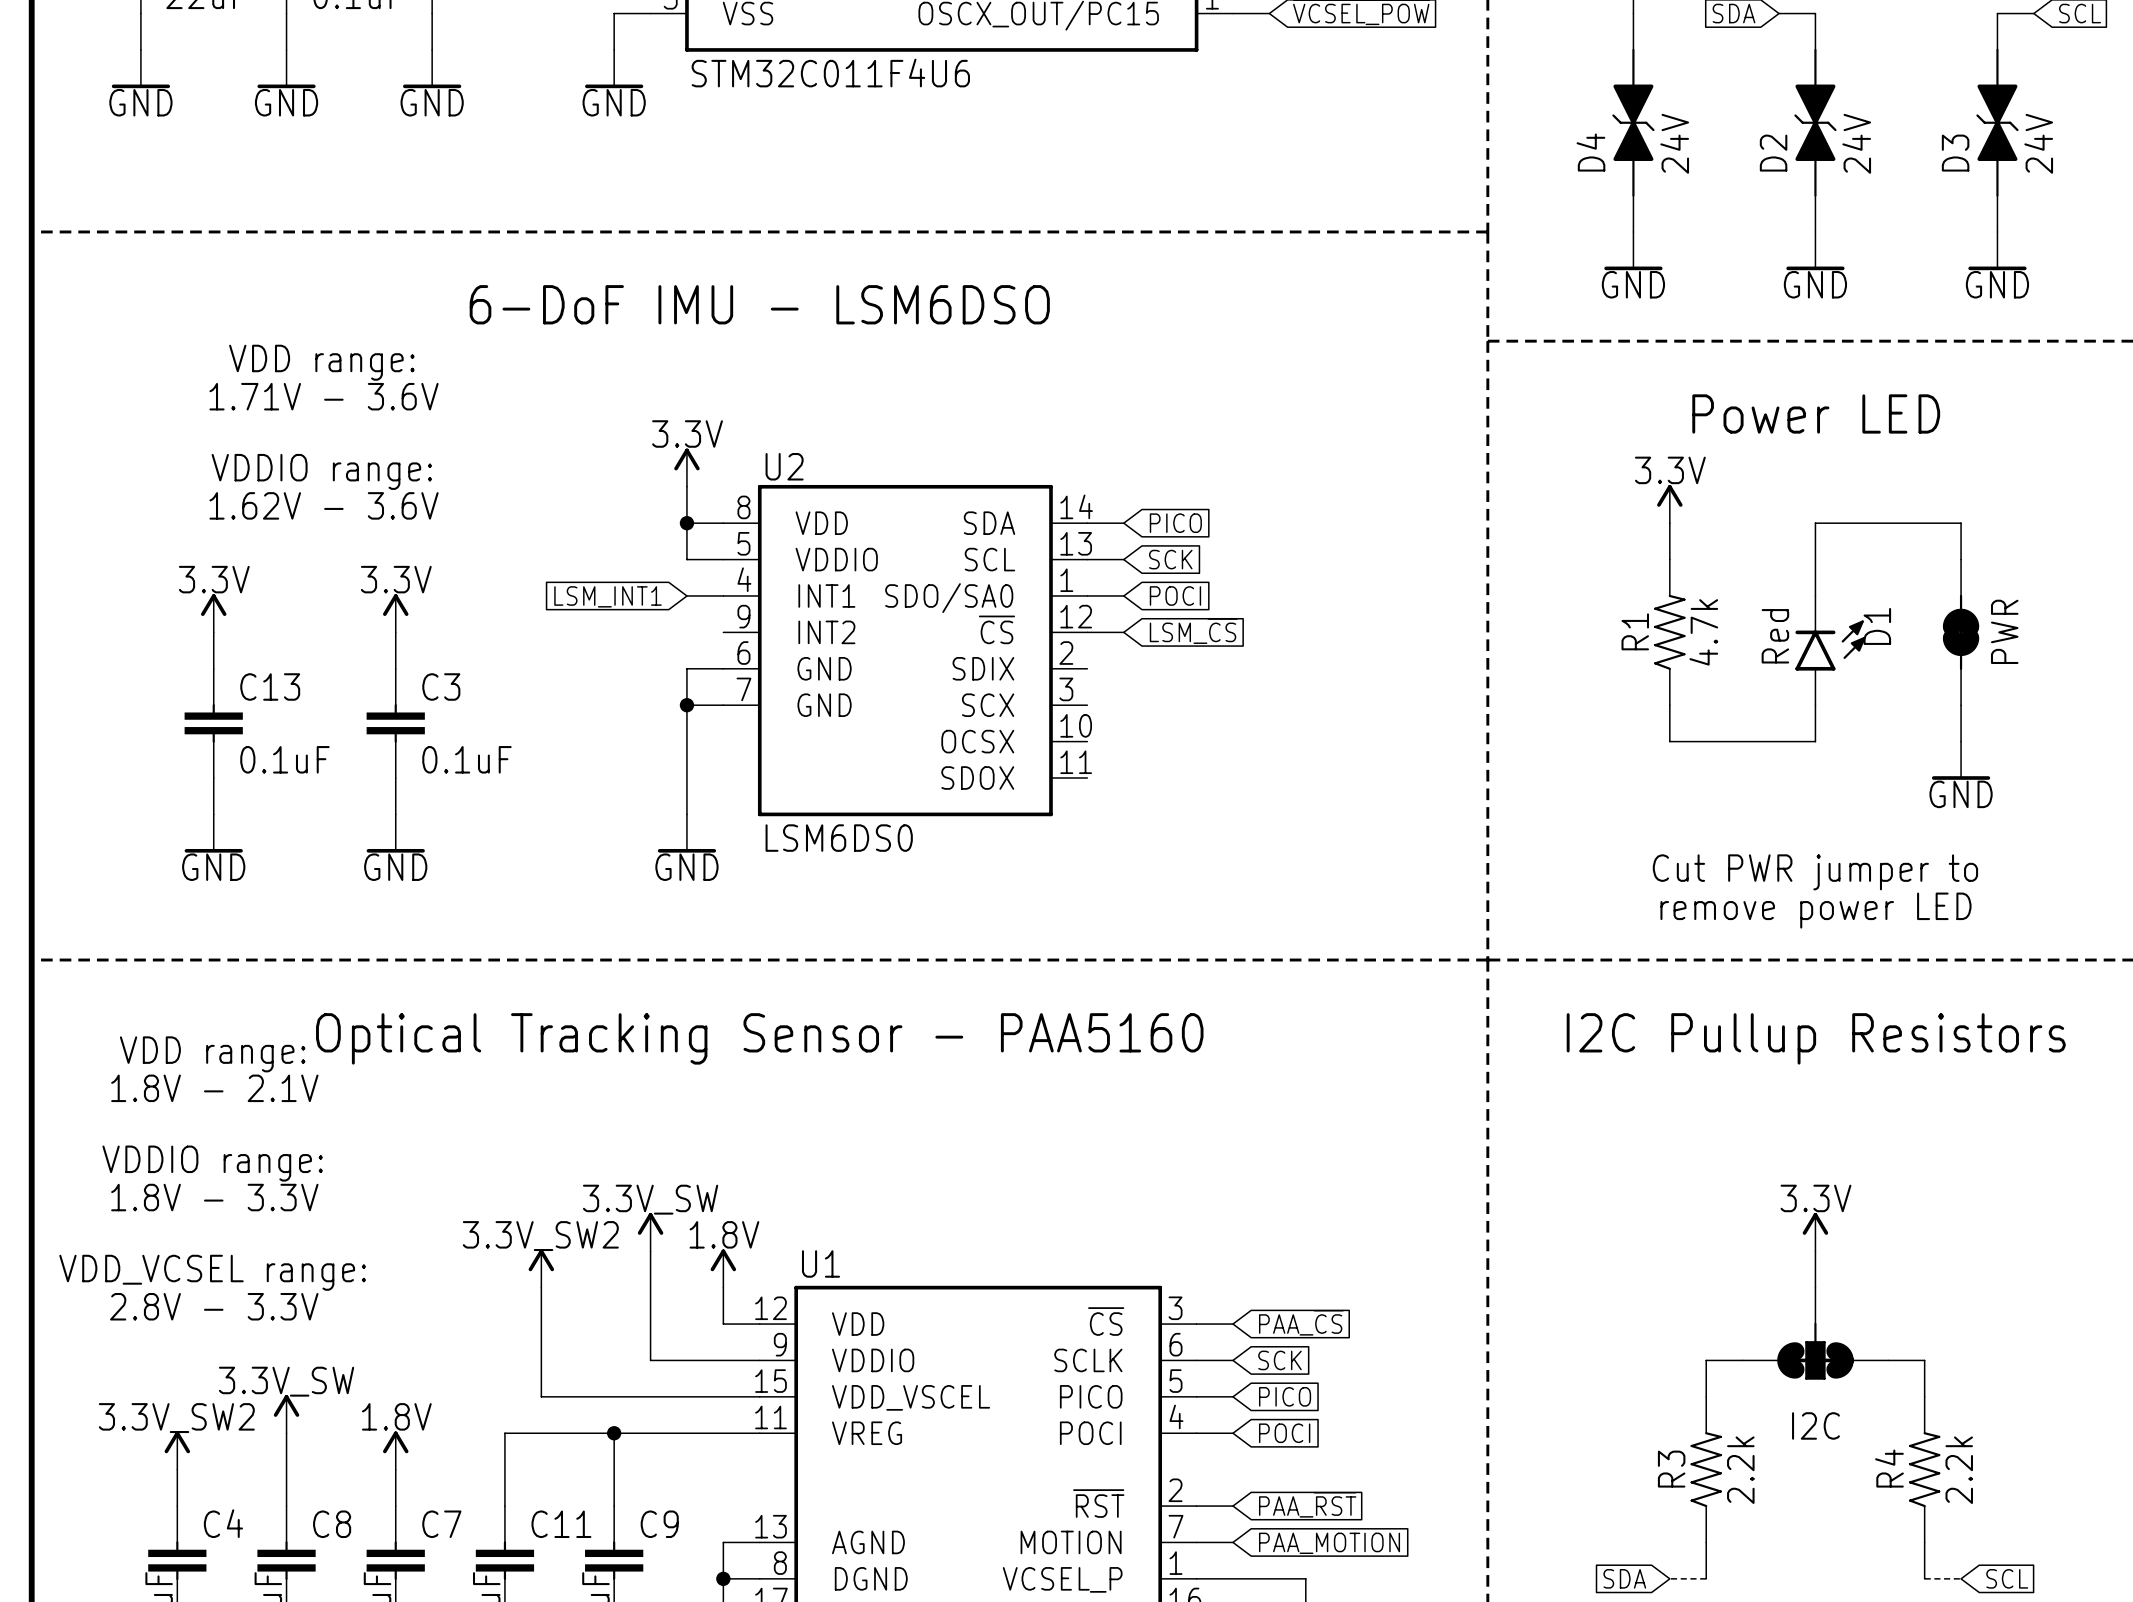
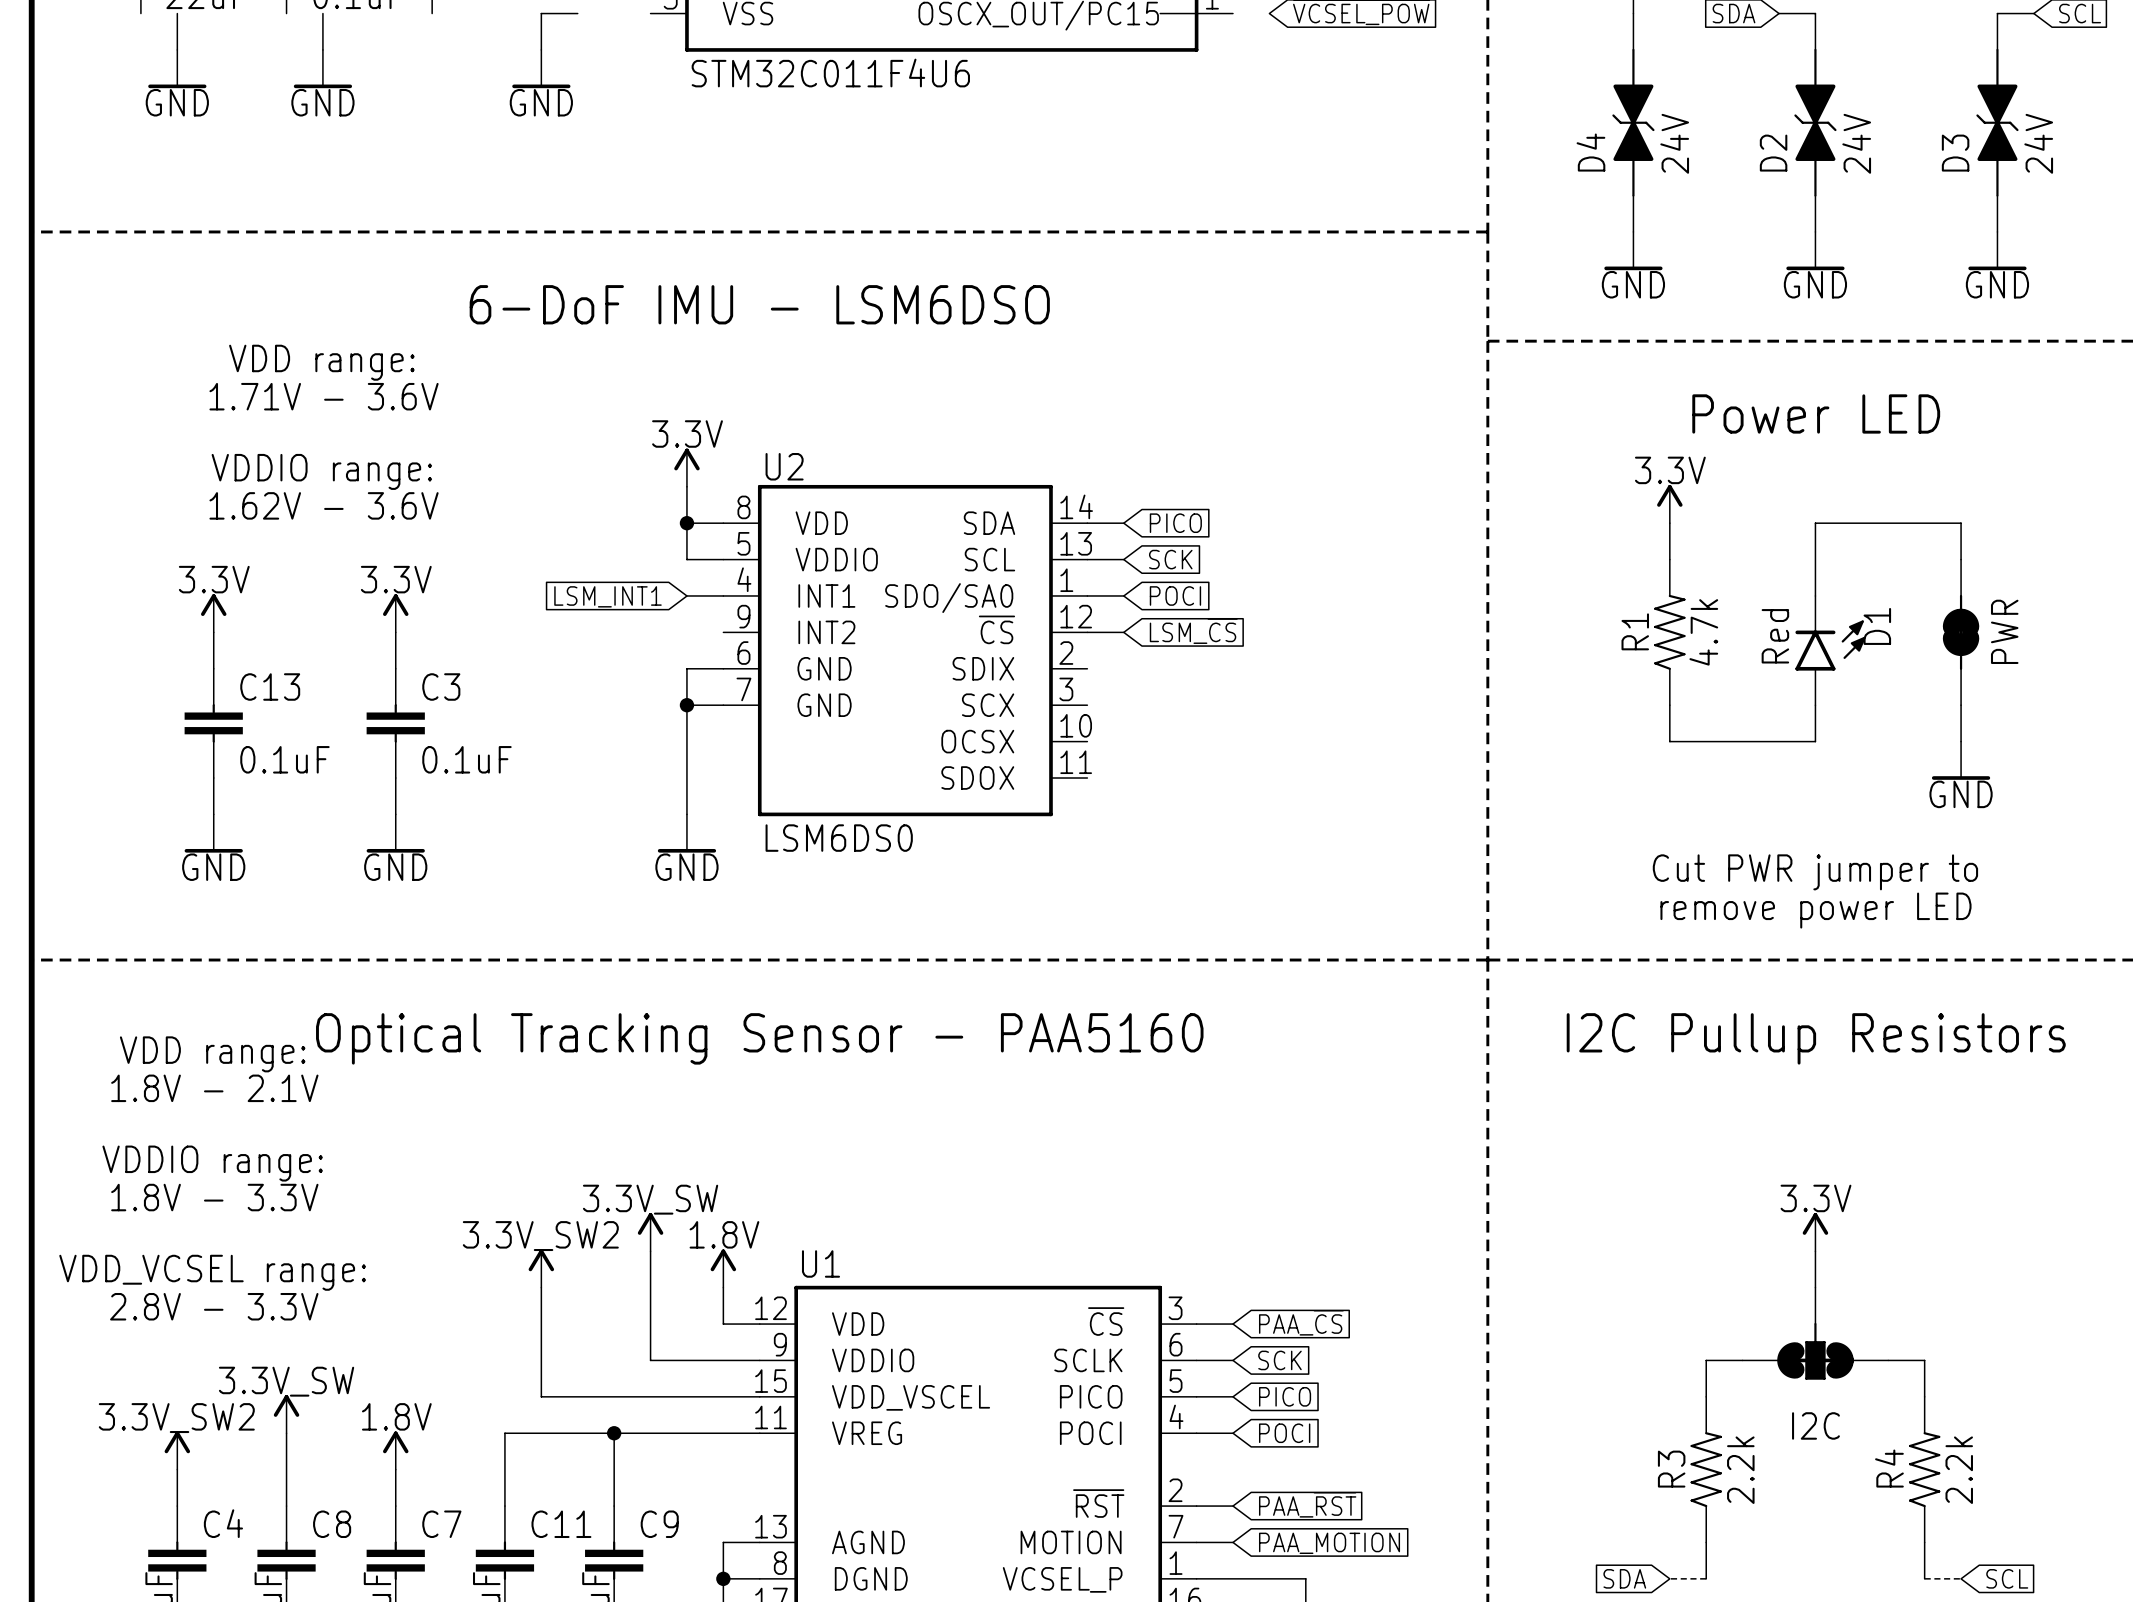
wire: (140, 13) (140, 49) -> (177, 13) (177, 49)
wire: (286, 13) (286, 49) -> (322, 13) (322, 49)
wire: (432, 13) (432, 49) -> none
wire: (650, 13) (614, 13) (614, 49) -> (577, 13) (541, 13) (541, 49)
wire: (1233, 13) (1269, 13) -> (1160, 13) (1196, 13)
power symbol position: GND (140, 69) -> GND (177, 69)
power symbol position: GND (286, 69) -> GND (322, 69)
power symbol: GND (432, 69) -> none
power symbol: none -> GND (541, 69)
power symbol: GND (614, 69) -> none

